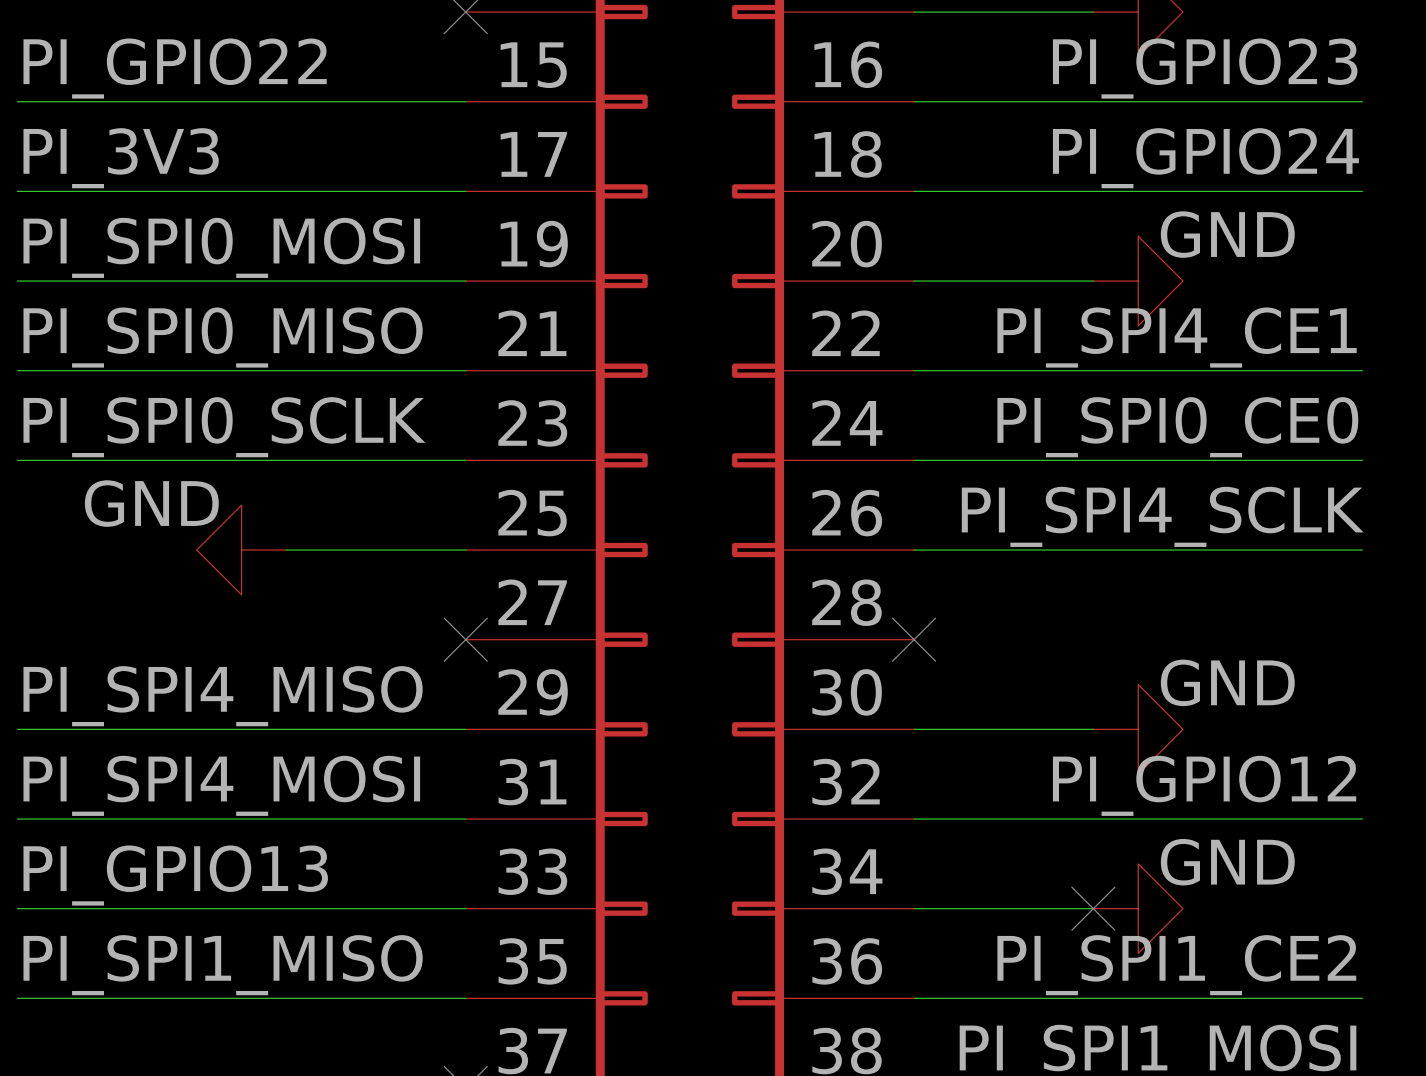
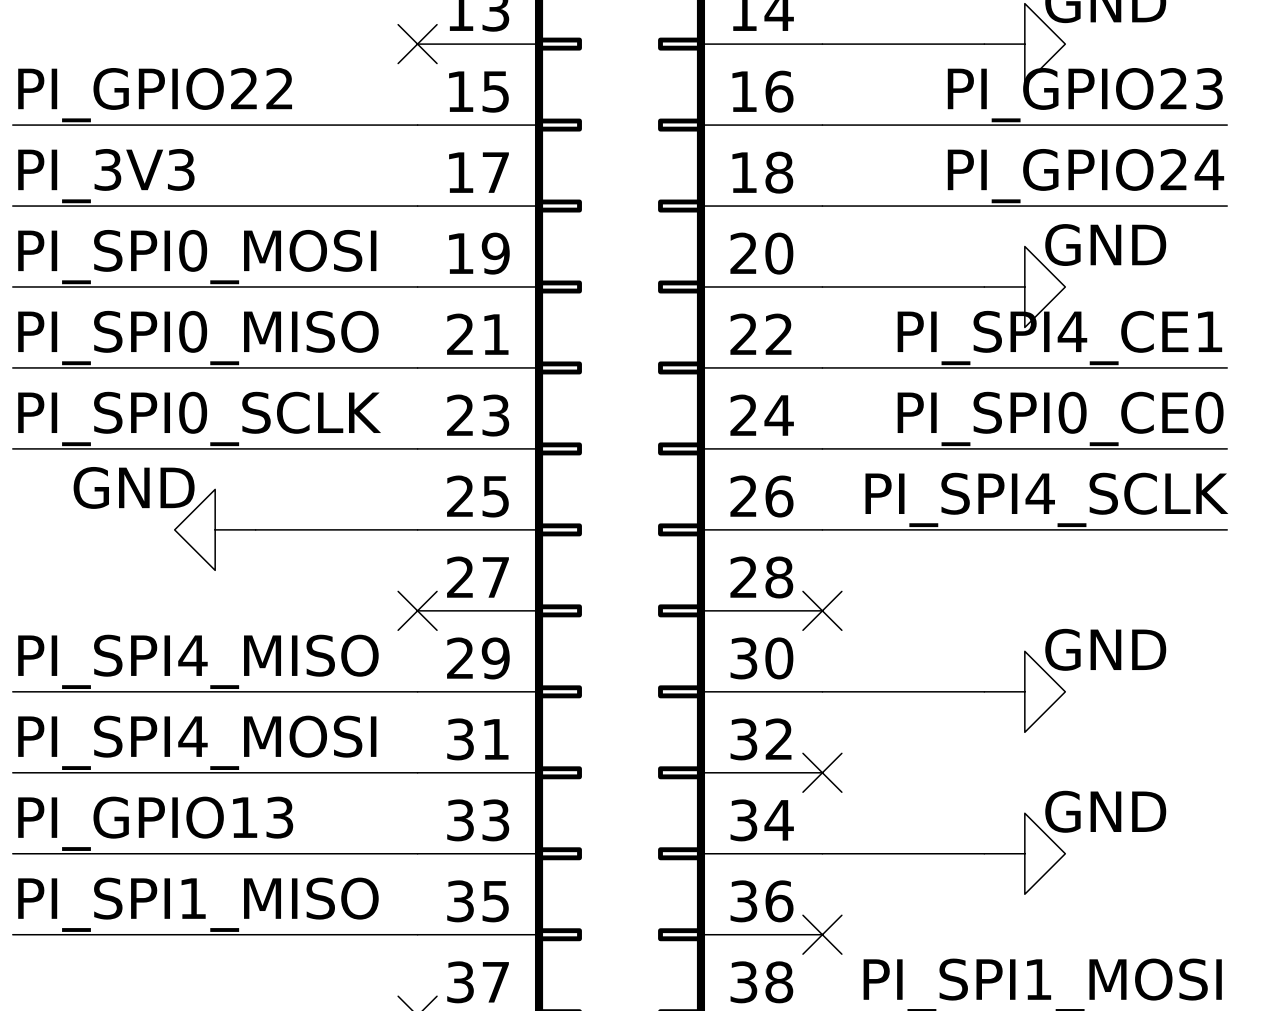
label: PI_GPIO12 (1204, 785) -> none
wire: (914, 819) (1362, 819) -> none
no-connect mark: none -> (822, 772)
no-connect mark: (1093, 908) -> none
label: PI_SPI1_CE2 (1176, 965) -> none
wire: (914, 998) (1362, 998) -> none
no-connect mark: none -> (822, 934)

